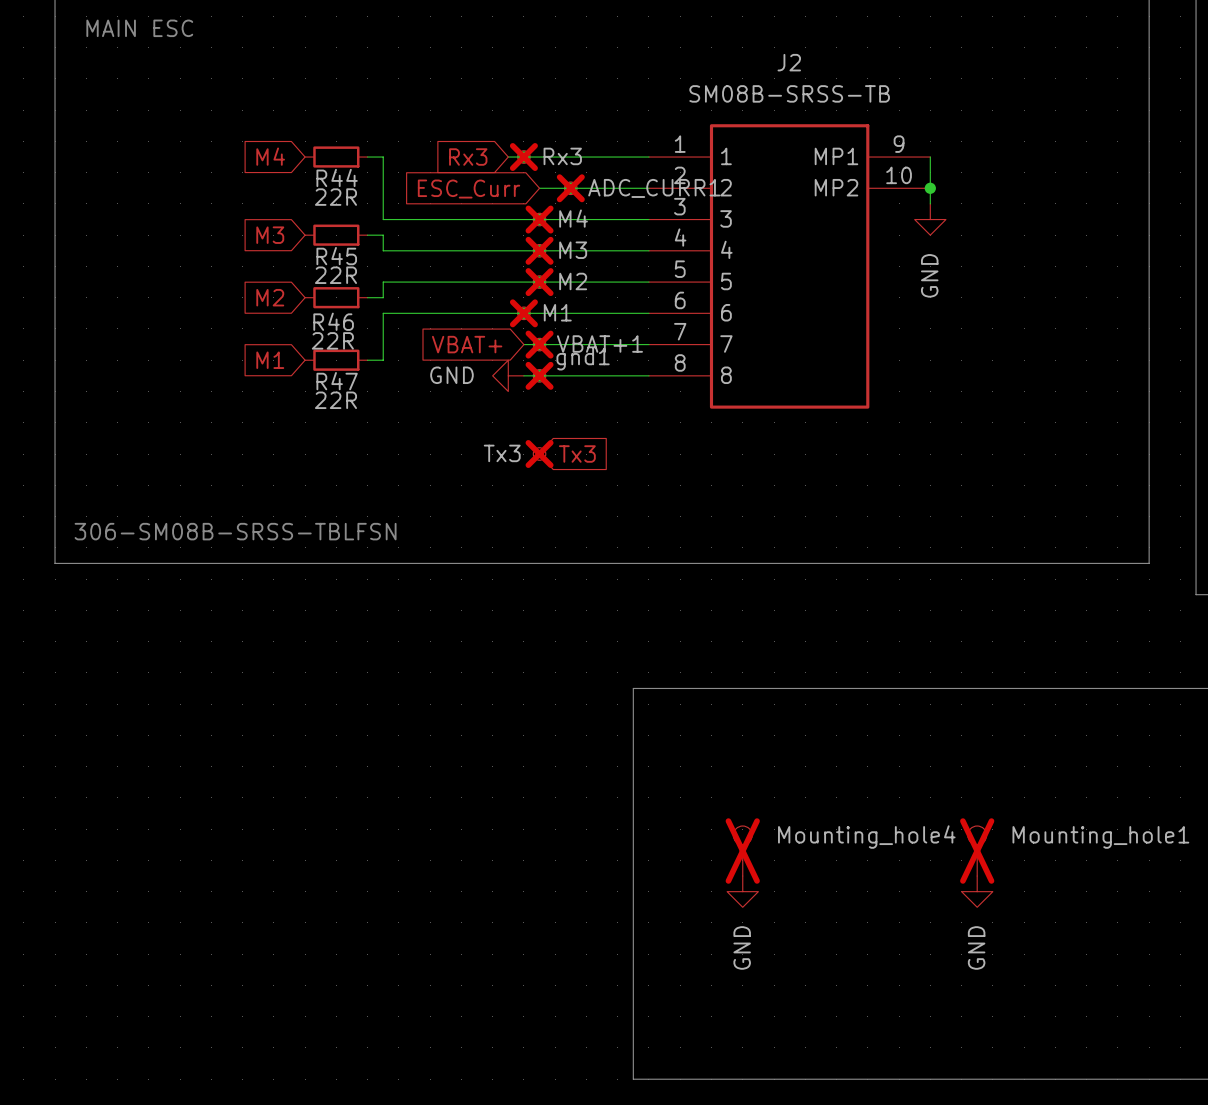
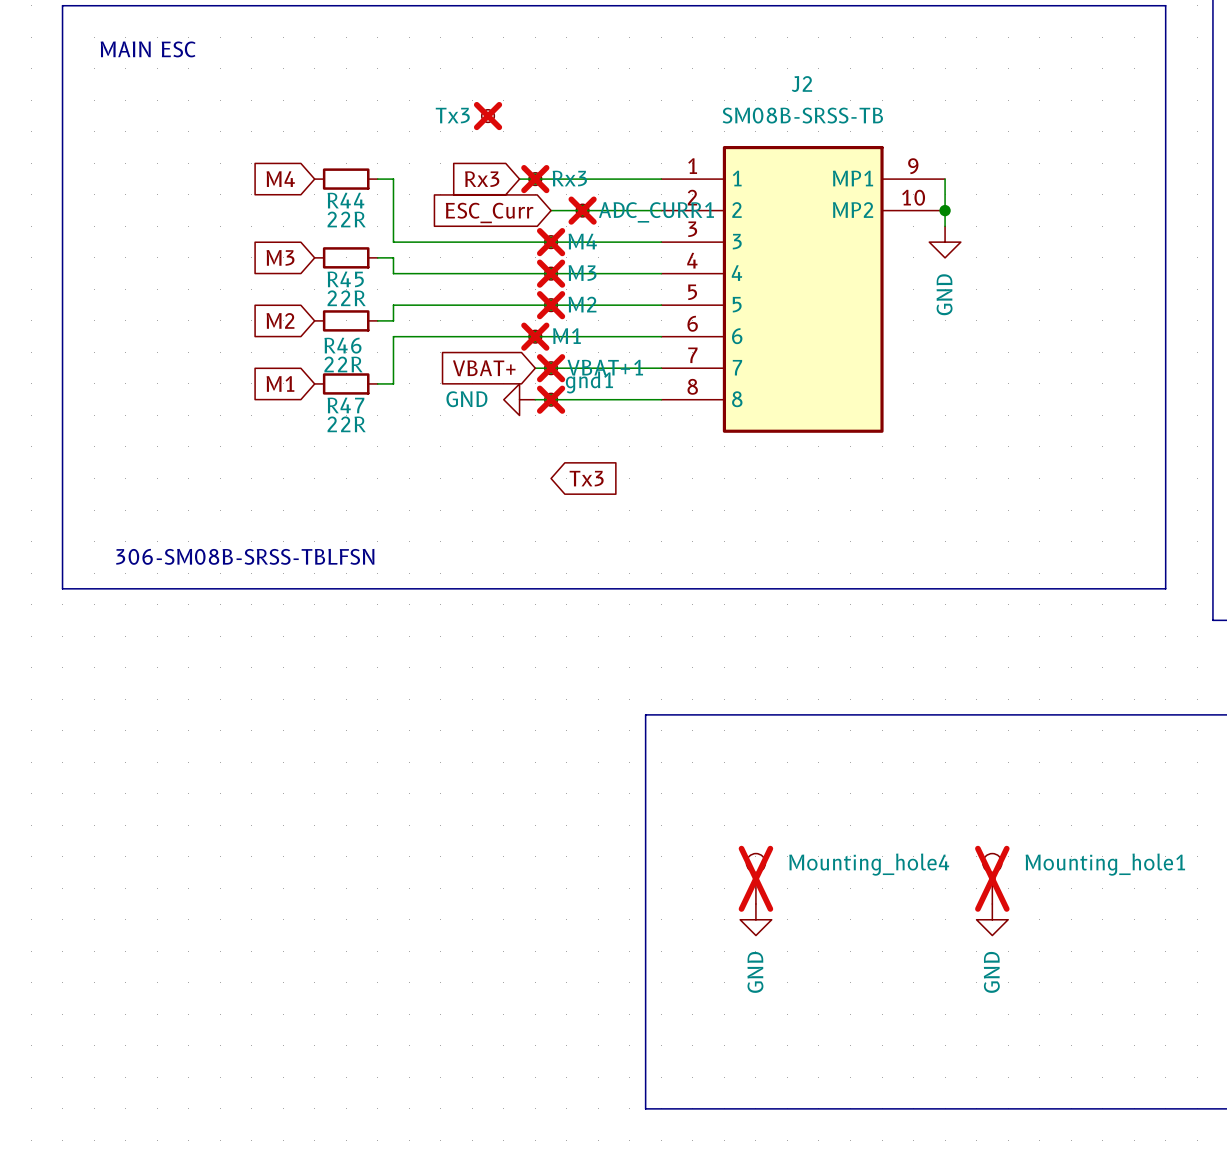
Tx3 position: (539, 454) -> (488, 116)

